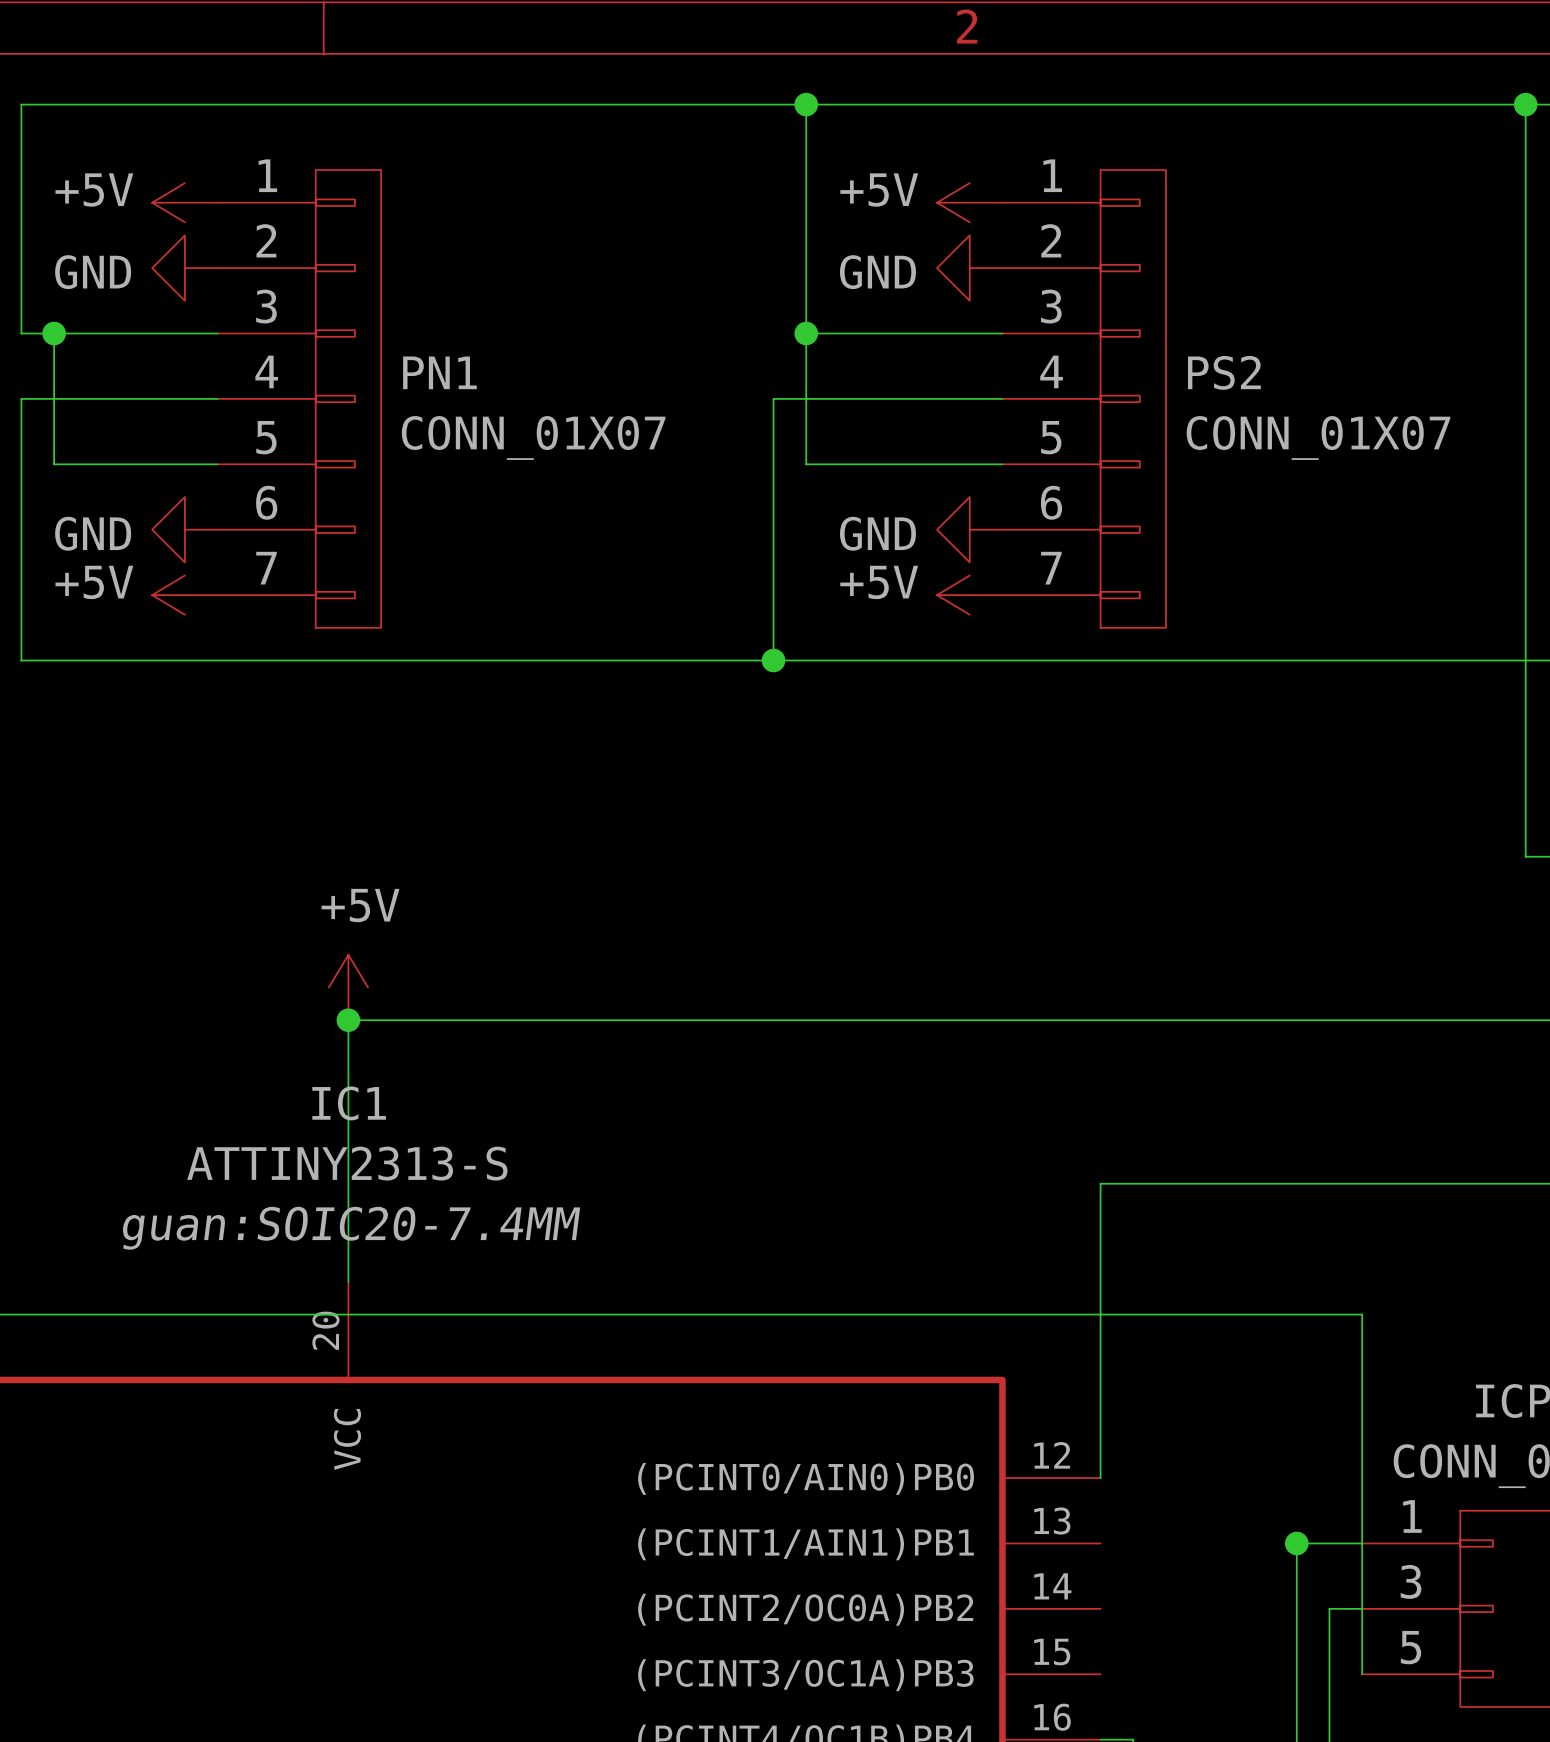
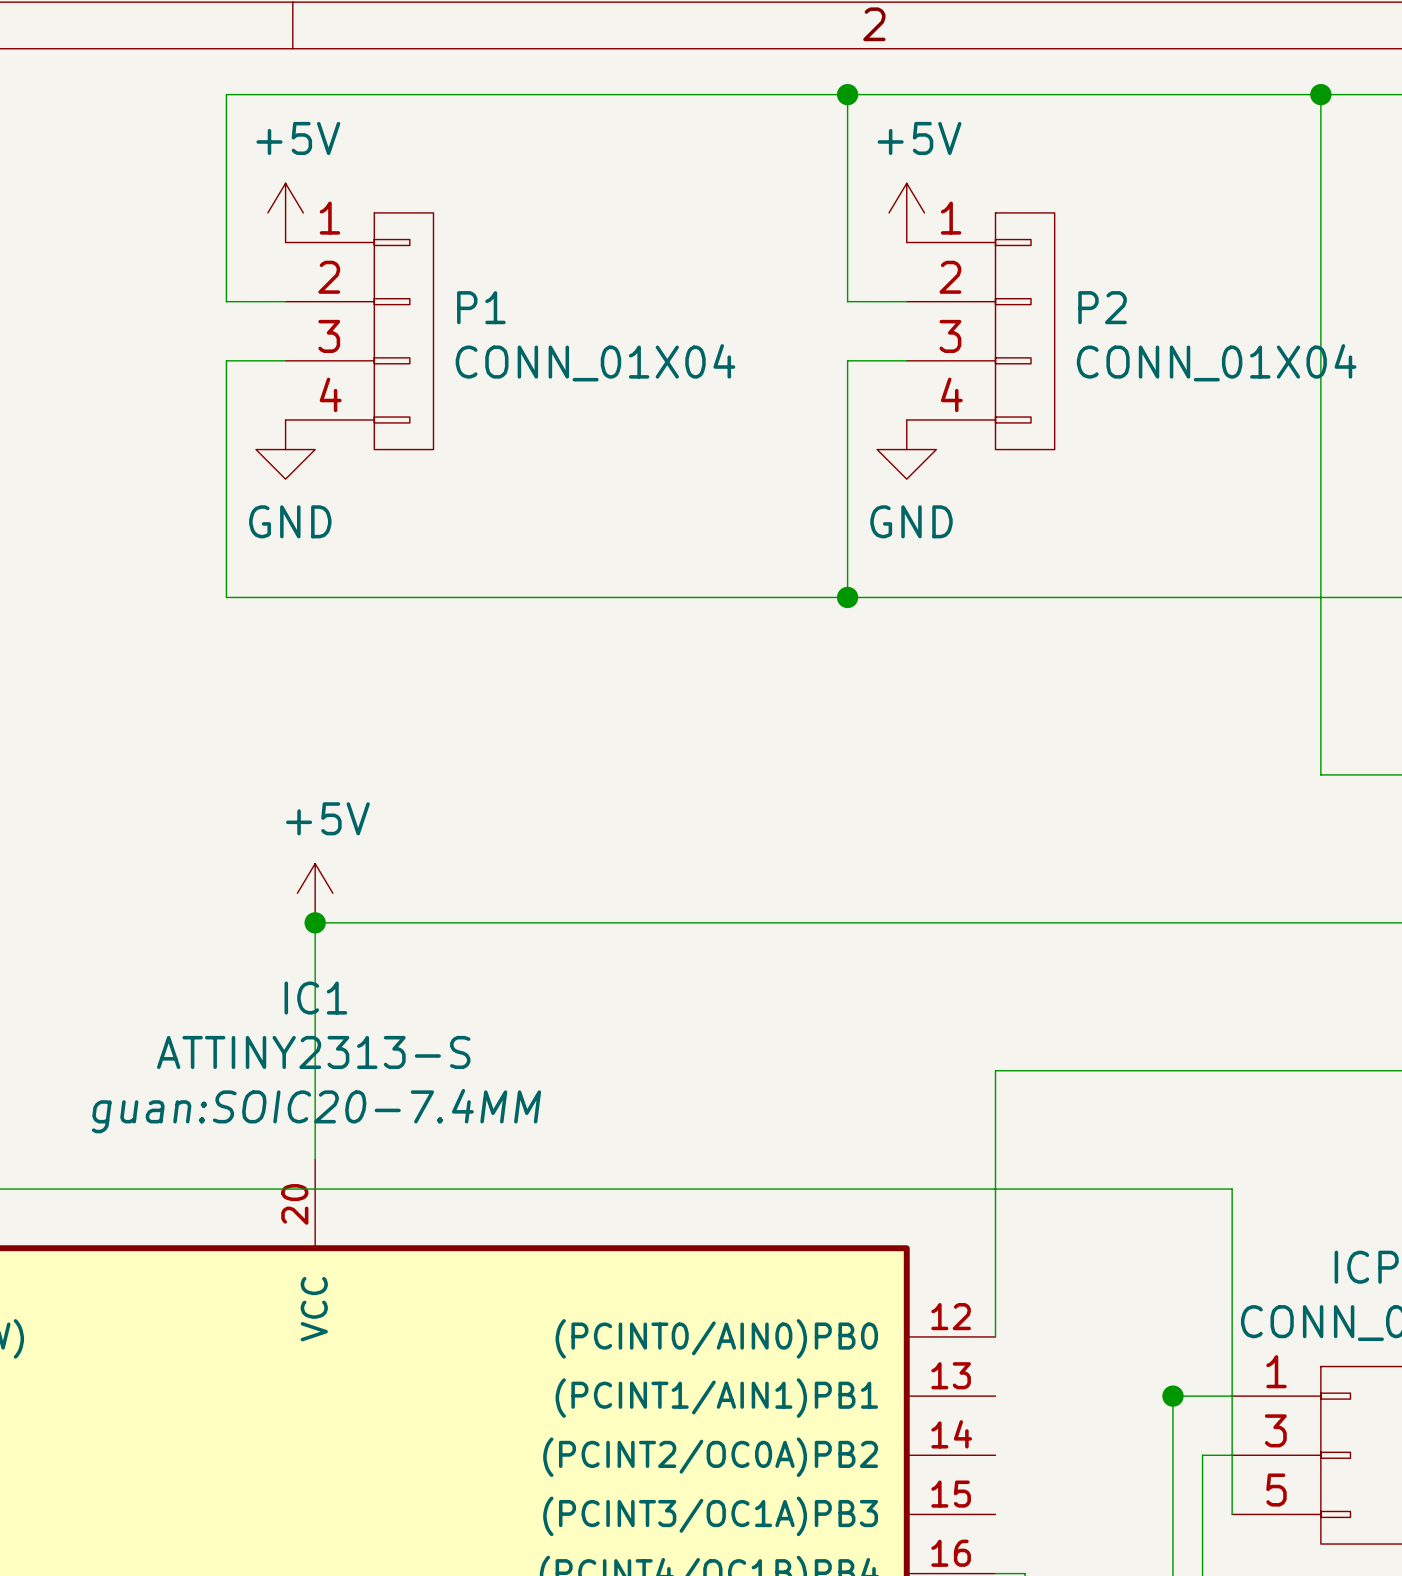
wire: (250, 104) (21, 104) (21, 333) (217, 333) -> (226, 94) (226, 301) (285, 301)
wire: (806, 104) (806, 464) (1002, 464) -> none
junction position: (806, 104) -> (847, 94)
wire: (1525, 104) (1525, 856) -> (1320, 94) (1320, 774) (1380, 774)
junction position: (1525, 104) -> (1320, 94)
power symbol rotation: 0° (184, 202) -> 90° clockwise (285, 212)
power symbol position: +5V (184, 202) -> +5V (285, 212)
power symbol rotation: 0° (969, 202) -> 90° clockwise (906, 212)
power symbol position: +5V (969, 202) -> +5V (906, 212)
power symbol: GND (184, 268) -> none
power symbol: GND (969, 268) -> none
wire: (54, 333) (54, 464) (217, 464) -> none
junction: (54, 333) -> none
wire: (806, 333) (937, 333) -> (847, 94) (847, 301)
junction: (806, 333) -> none
P1: none -> CONN_01X04 (359, 331)
P2: none -> CONN_01X04 (980, 331)
wire: (217, 398) (21, 398) (21, 660) (250, 660) -> (285, 360) (226, 360) (226, 597)
PN1: CONN_01X07 (299, 398) -> none
wire: (937, 398) (773, 398) (773, 660) -> (847, 360) (847, 597)
PS2: CONN_01X07 (1084, 398) -> none
power symbol: none -> GND (285, 449)
power symbol: GND (184, 529) -> none
power symbol rotation: 0° (969, 529) -> 90° counterclockwise (906, 449)
power symbol position: GND (969, 529) -> GND (906, 449)
power symbol: +5V (184, 595) -> none
power symbol: +5V (969, 595) -> none
junction: (773, 660) -> none
junction: none -> (847, 597)

